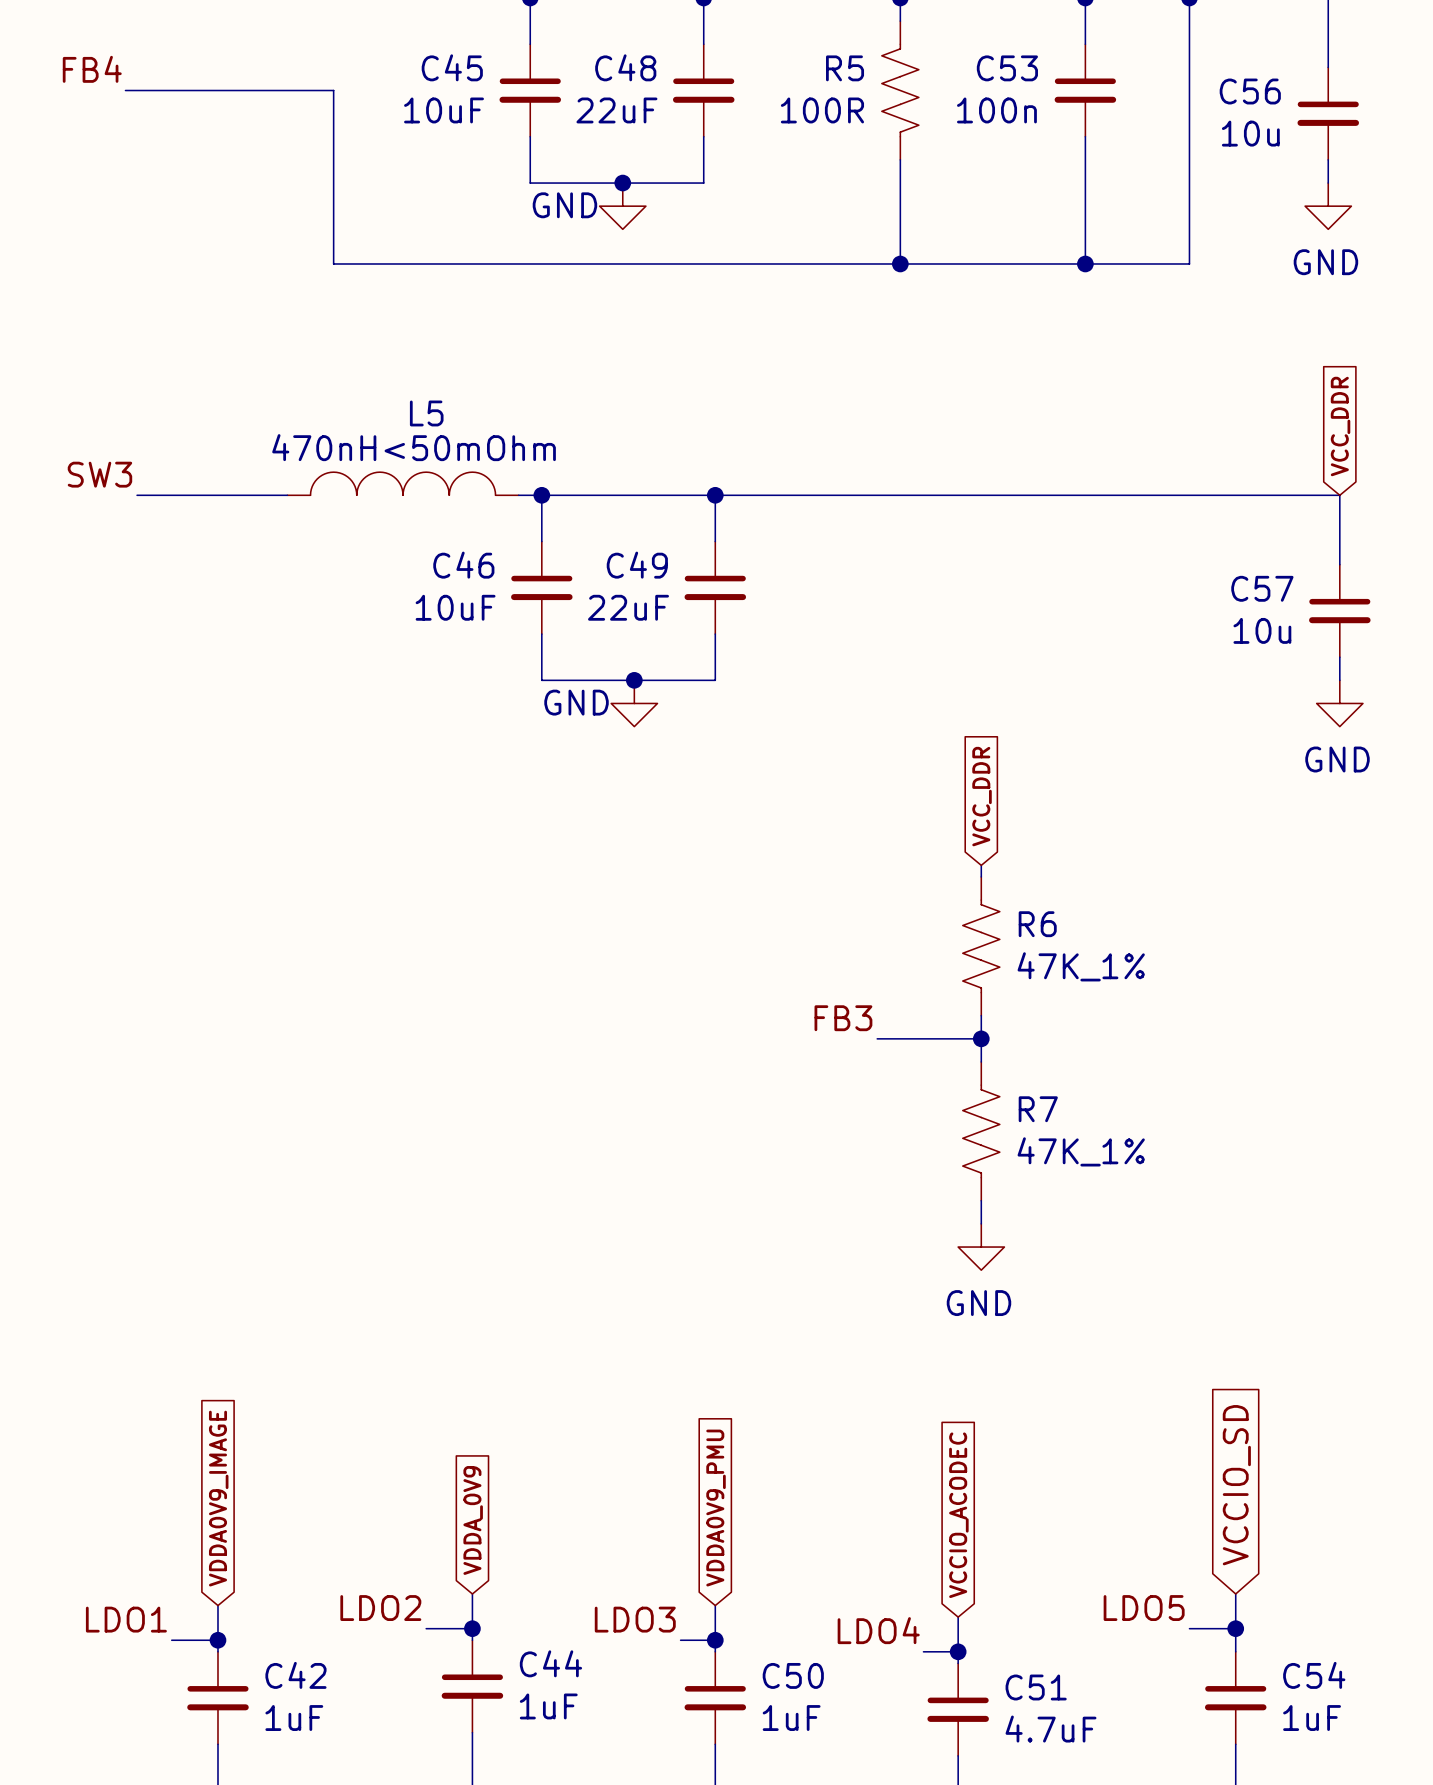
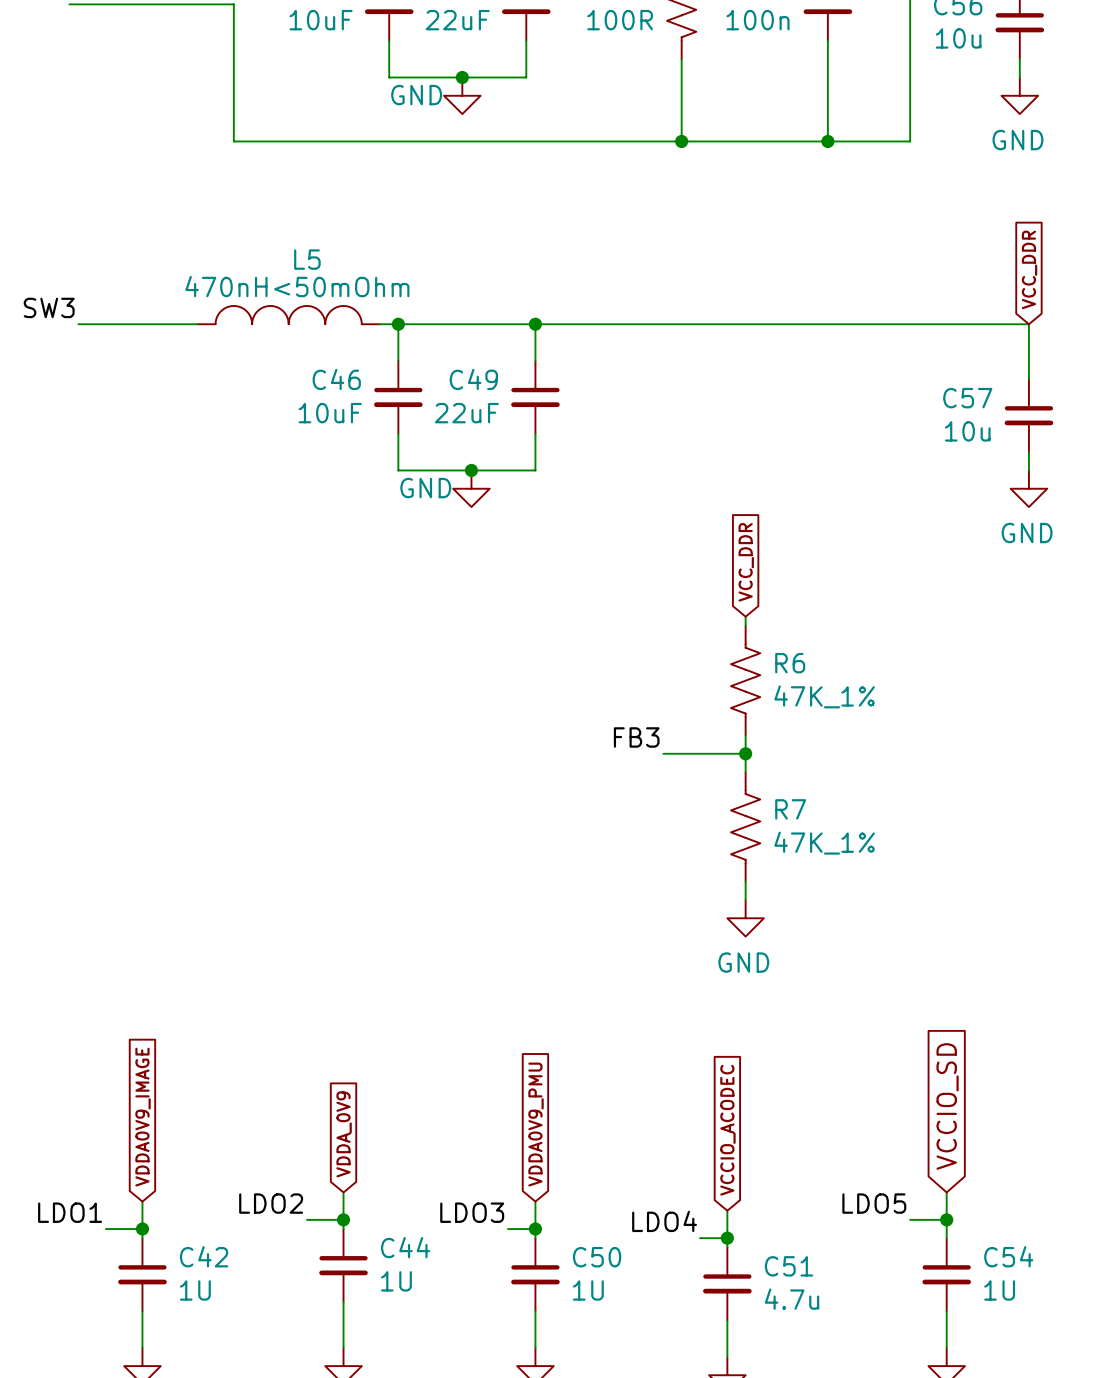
C44 value: 1uF (548, 1706) -> 1U (396, 1281)
C42 value: 1uF (294, 1718) -> 1U (195, 1290)
C50 value: 1uF (791, 1718) -> 1U (588, 1290)
C54 value: 1uF (1312, 1718) -> 1U (999, 1290)
C51 value: 4.7uF (1051, 1729) -> 4.7u (792, 1299)

